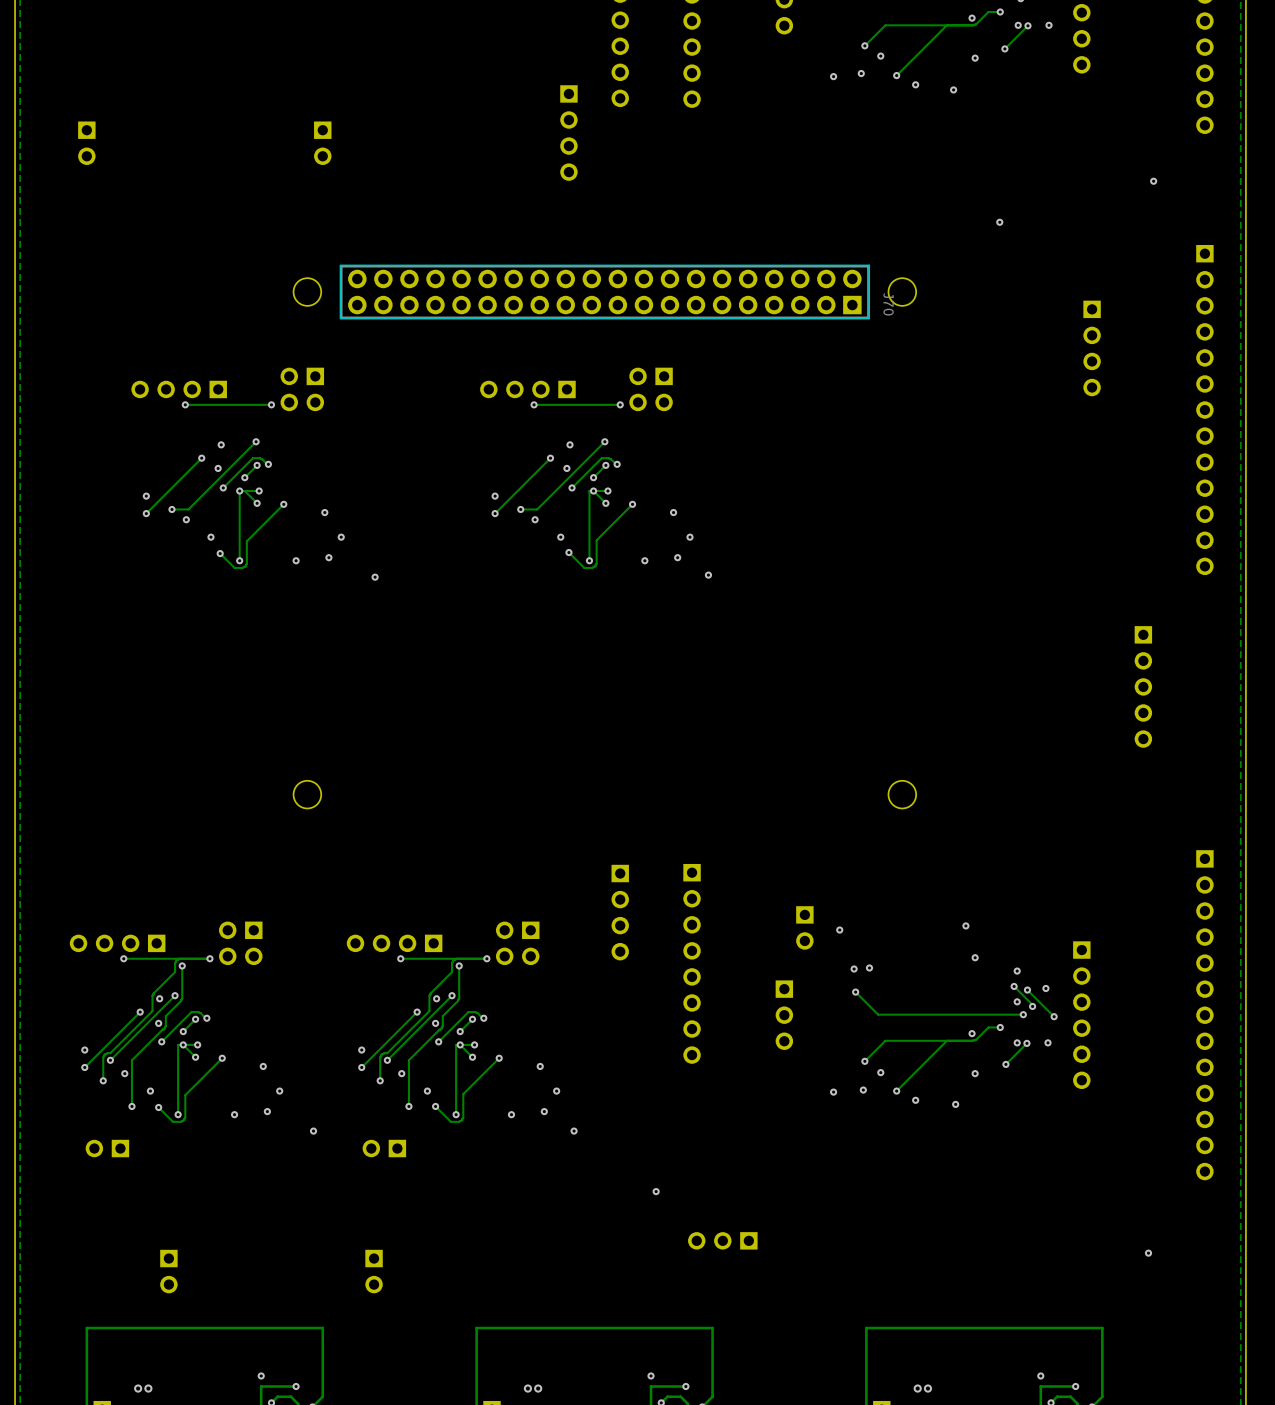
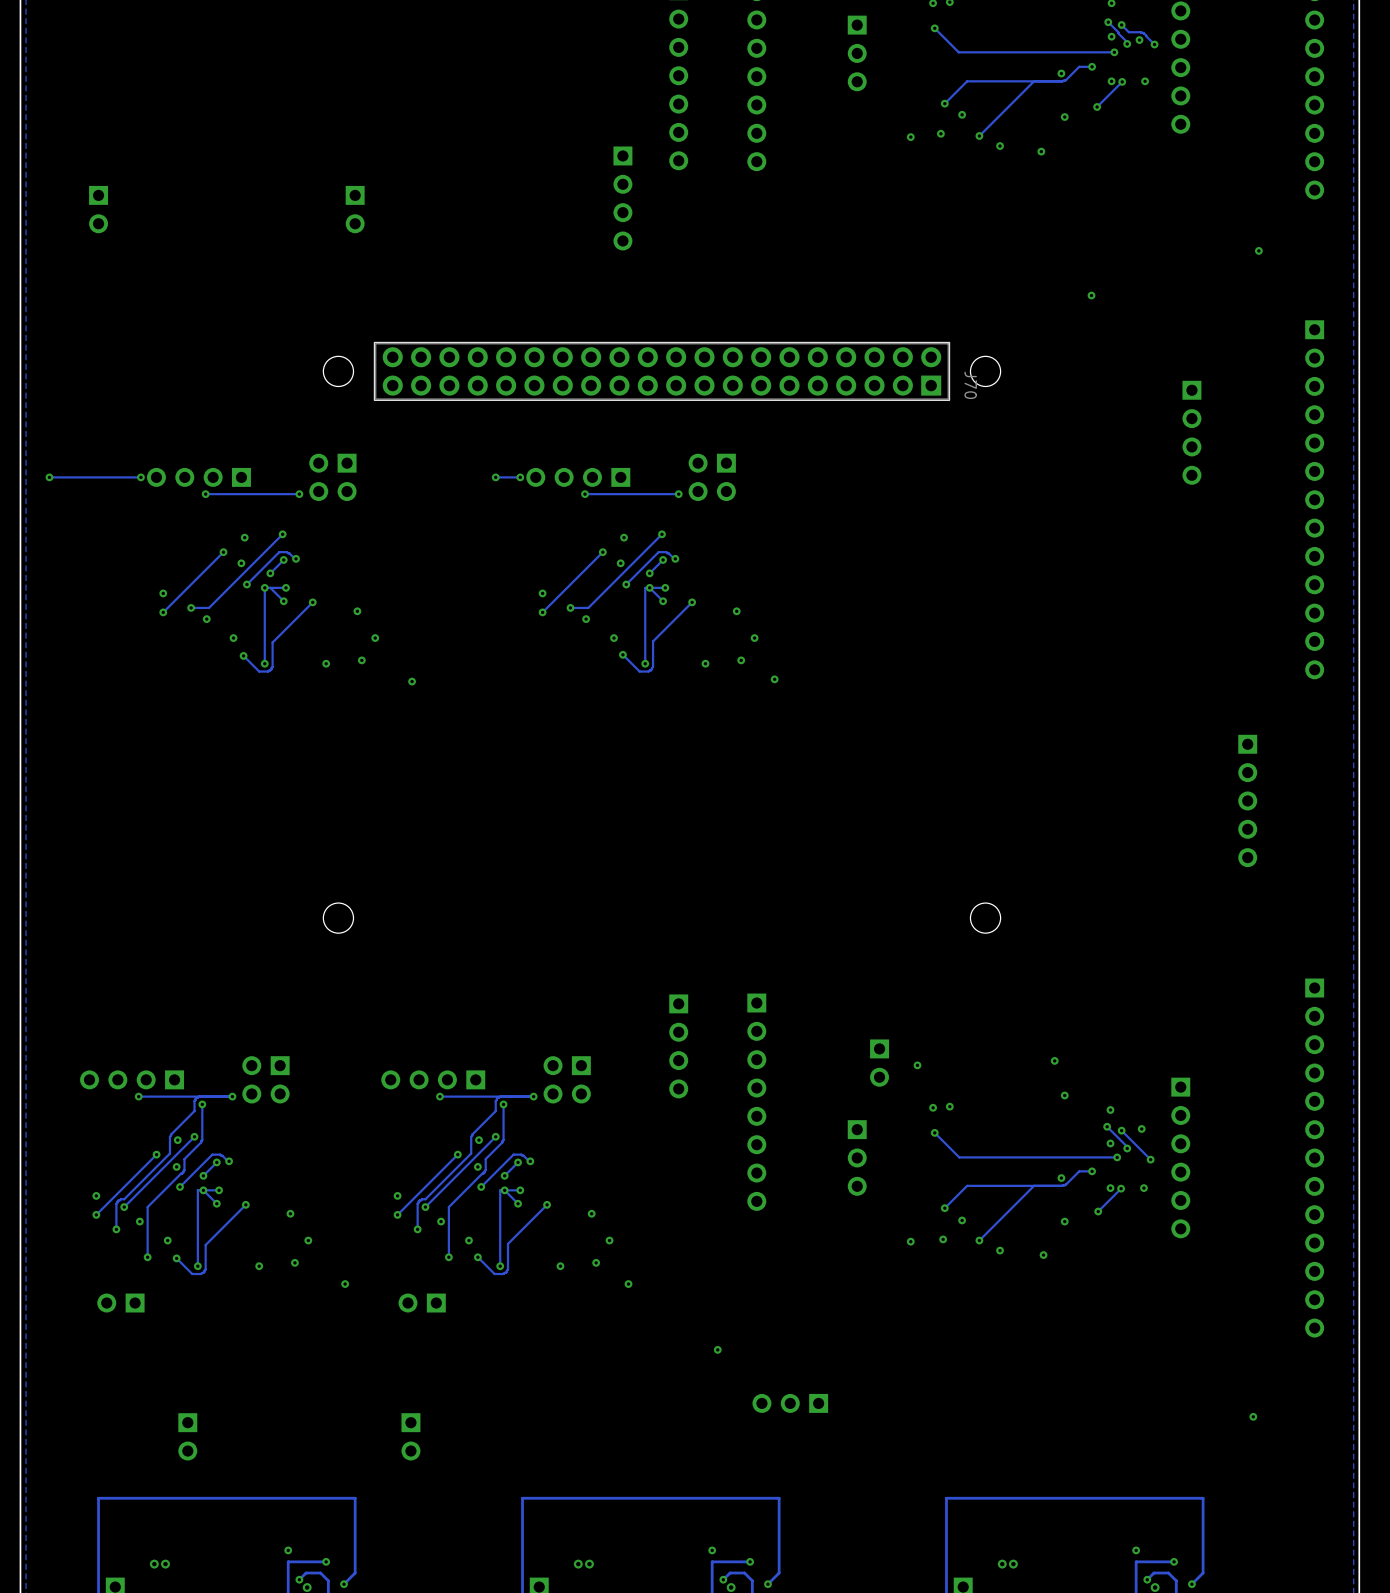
via: none -> (49, 477)
track: none -> (140, 477) (49, 477)
via: none -> (140, 477)
via: none -> (495, 477)
track: none -> (520, 477) (495, 477)
via: none -> (520, 477)

